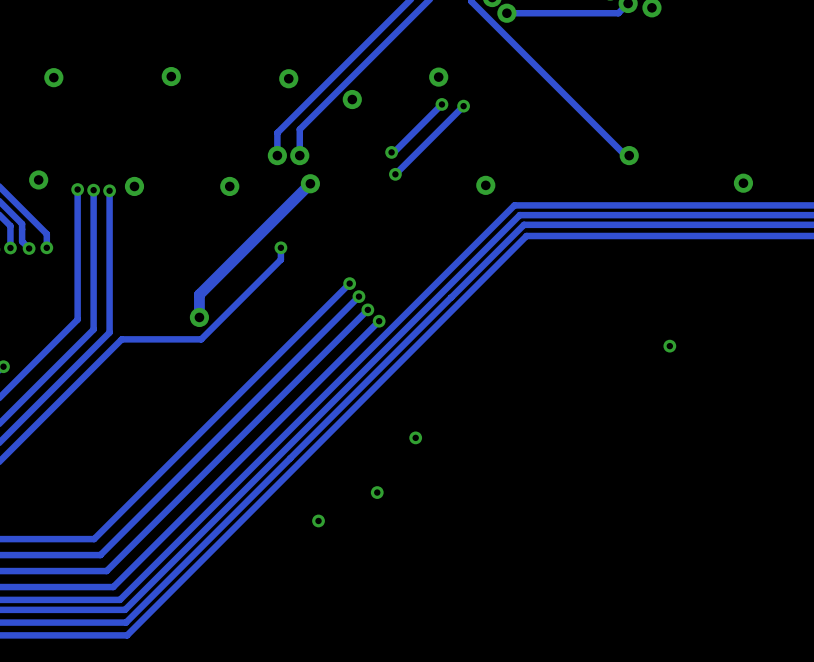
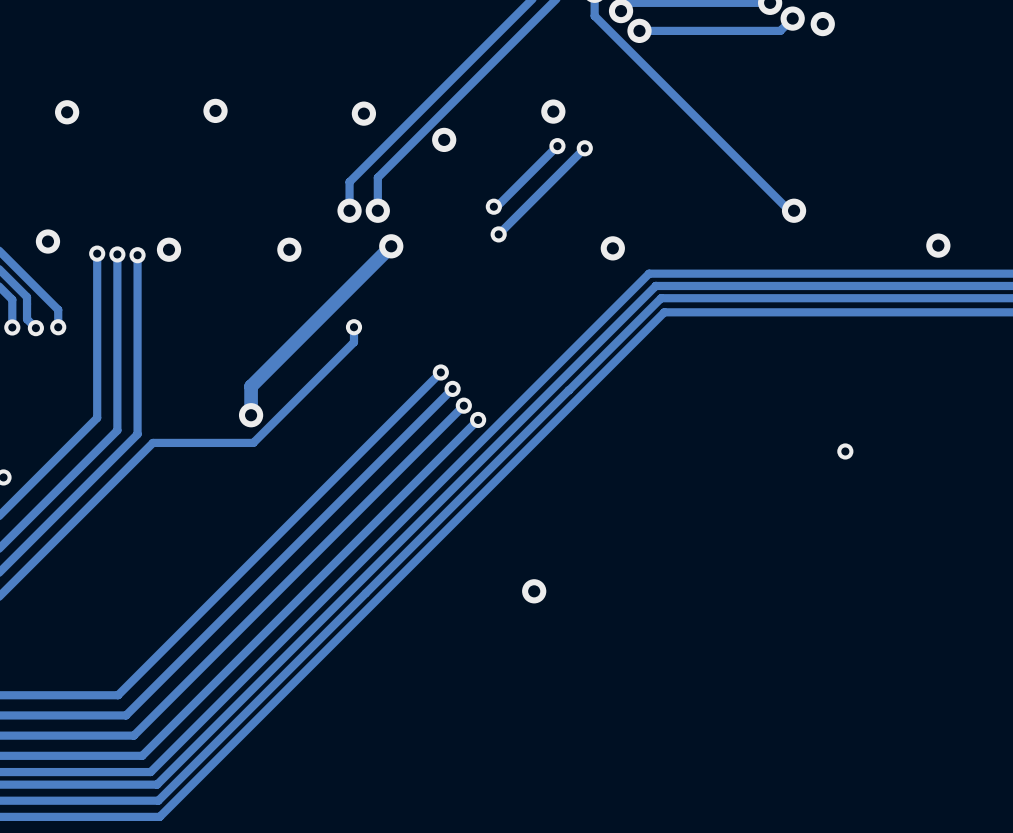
via: (415, 437) -> none
via: none -> (534, 591)
via: (377, 492) -> none
via: (318, 520) -> none

